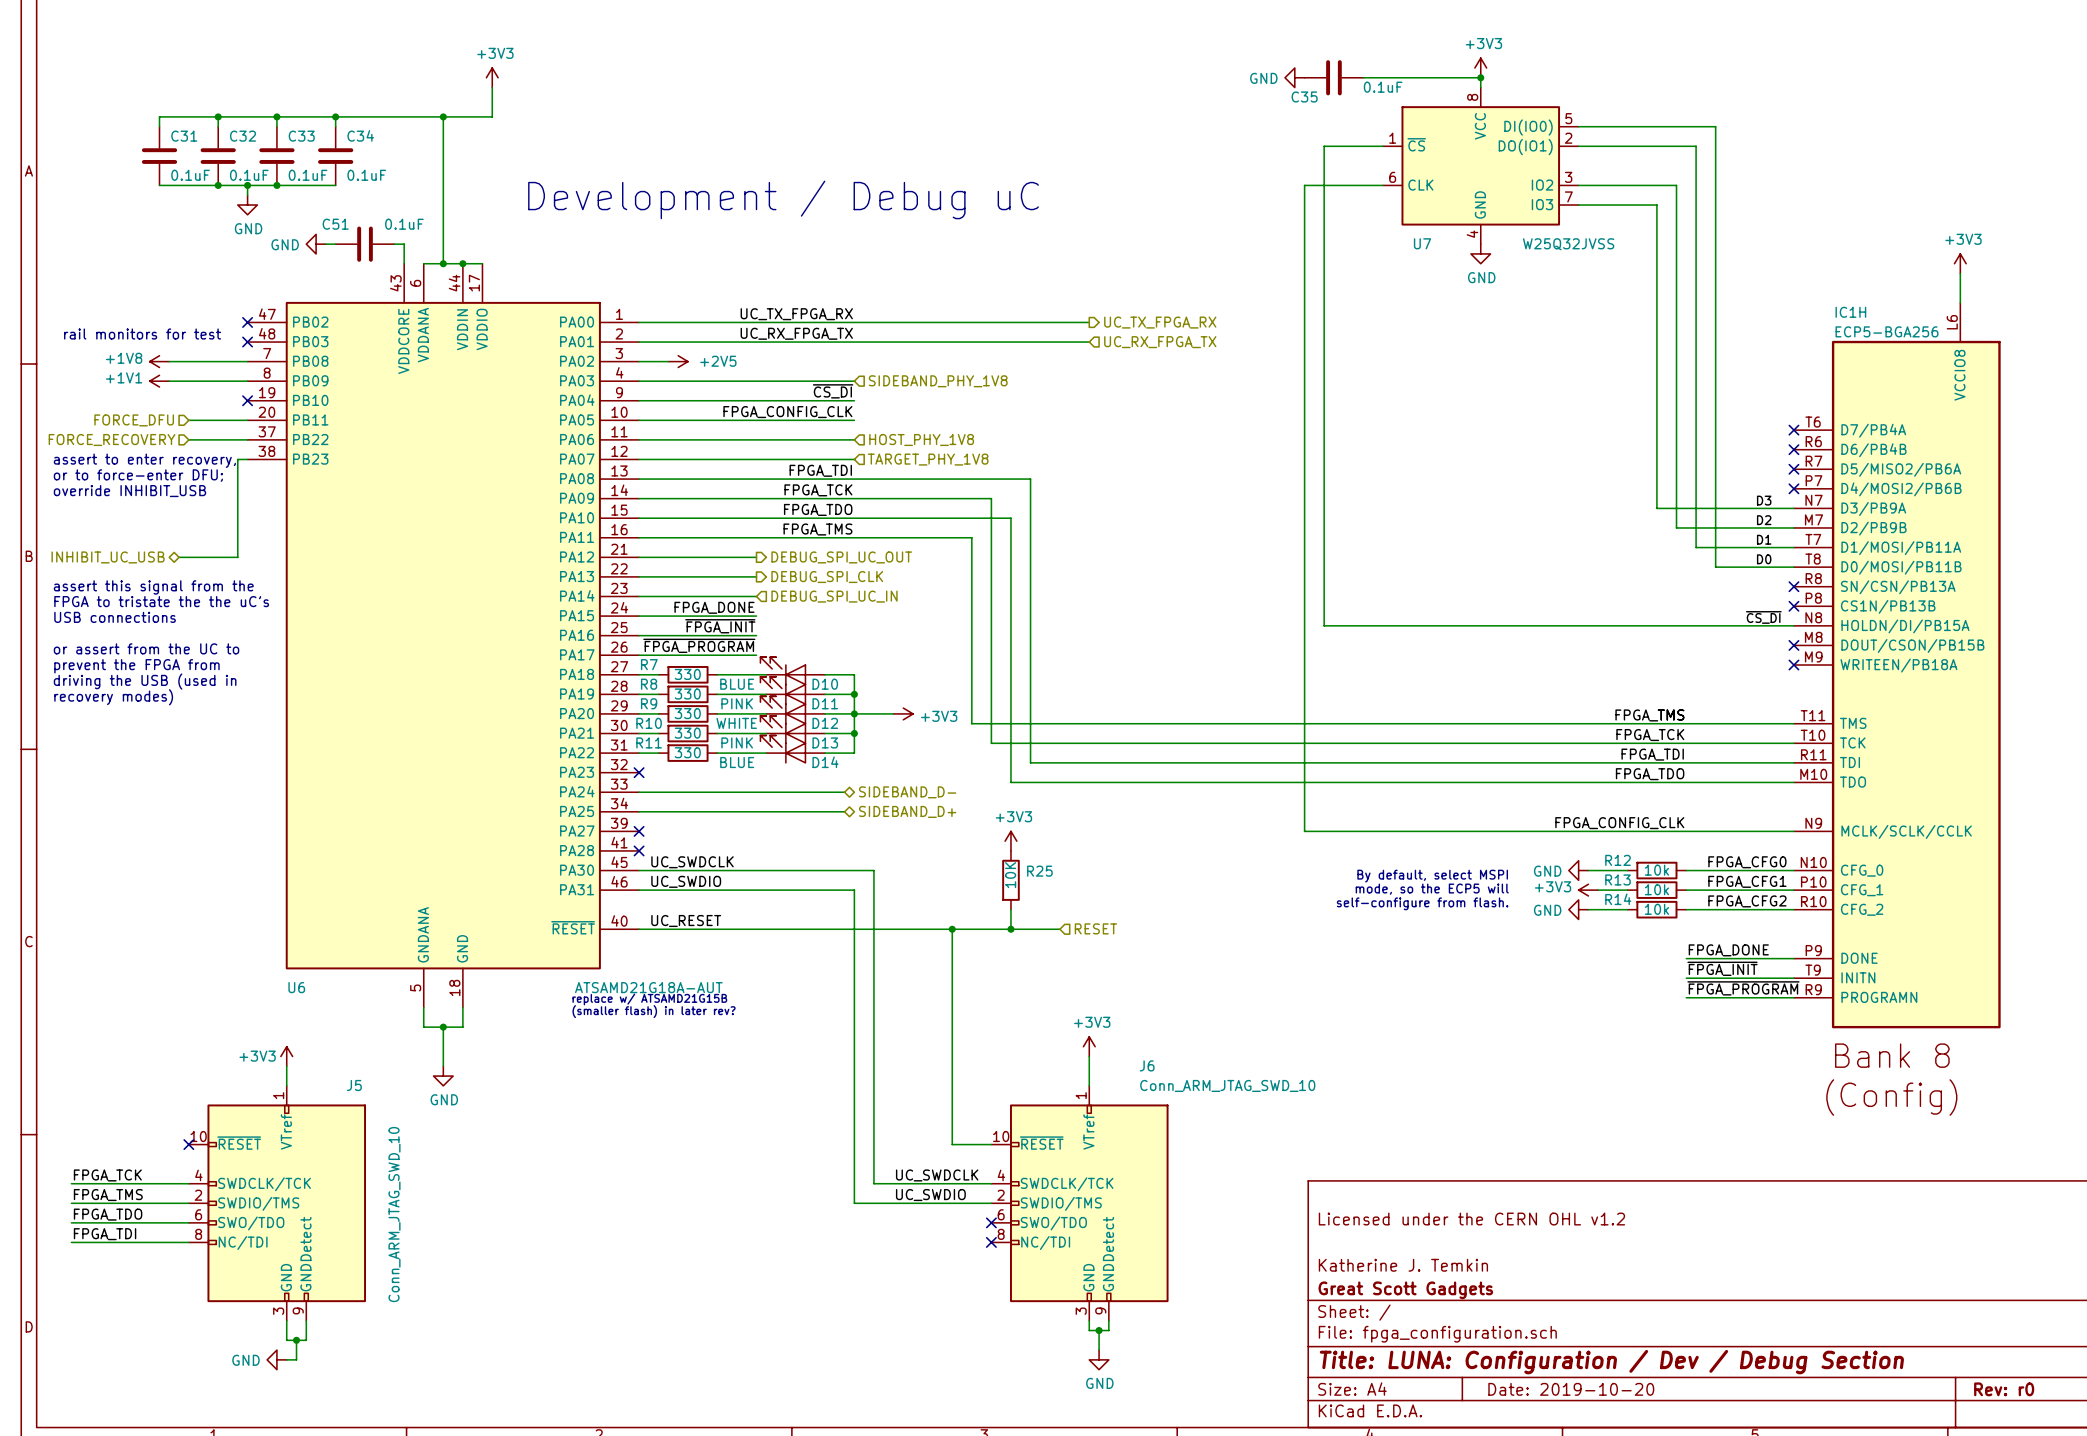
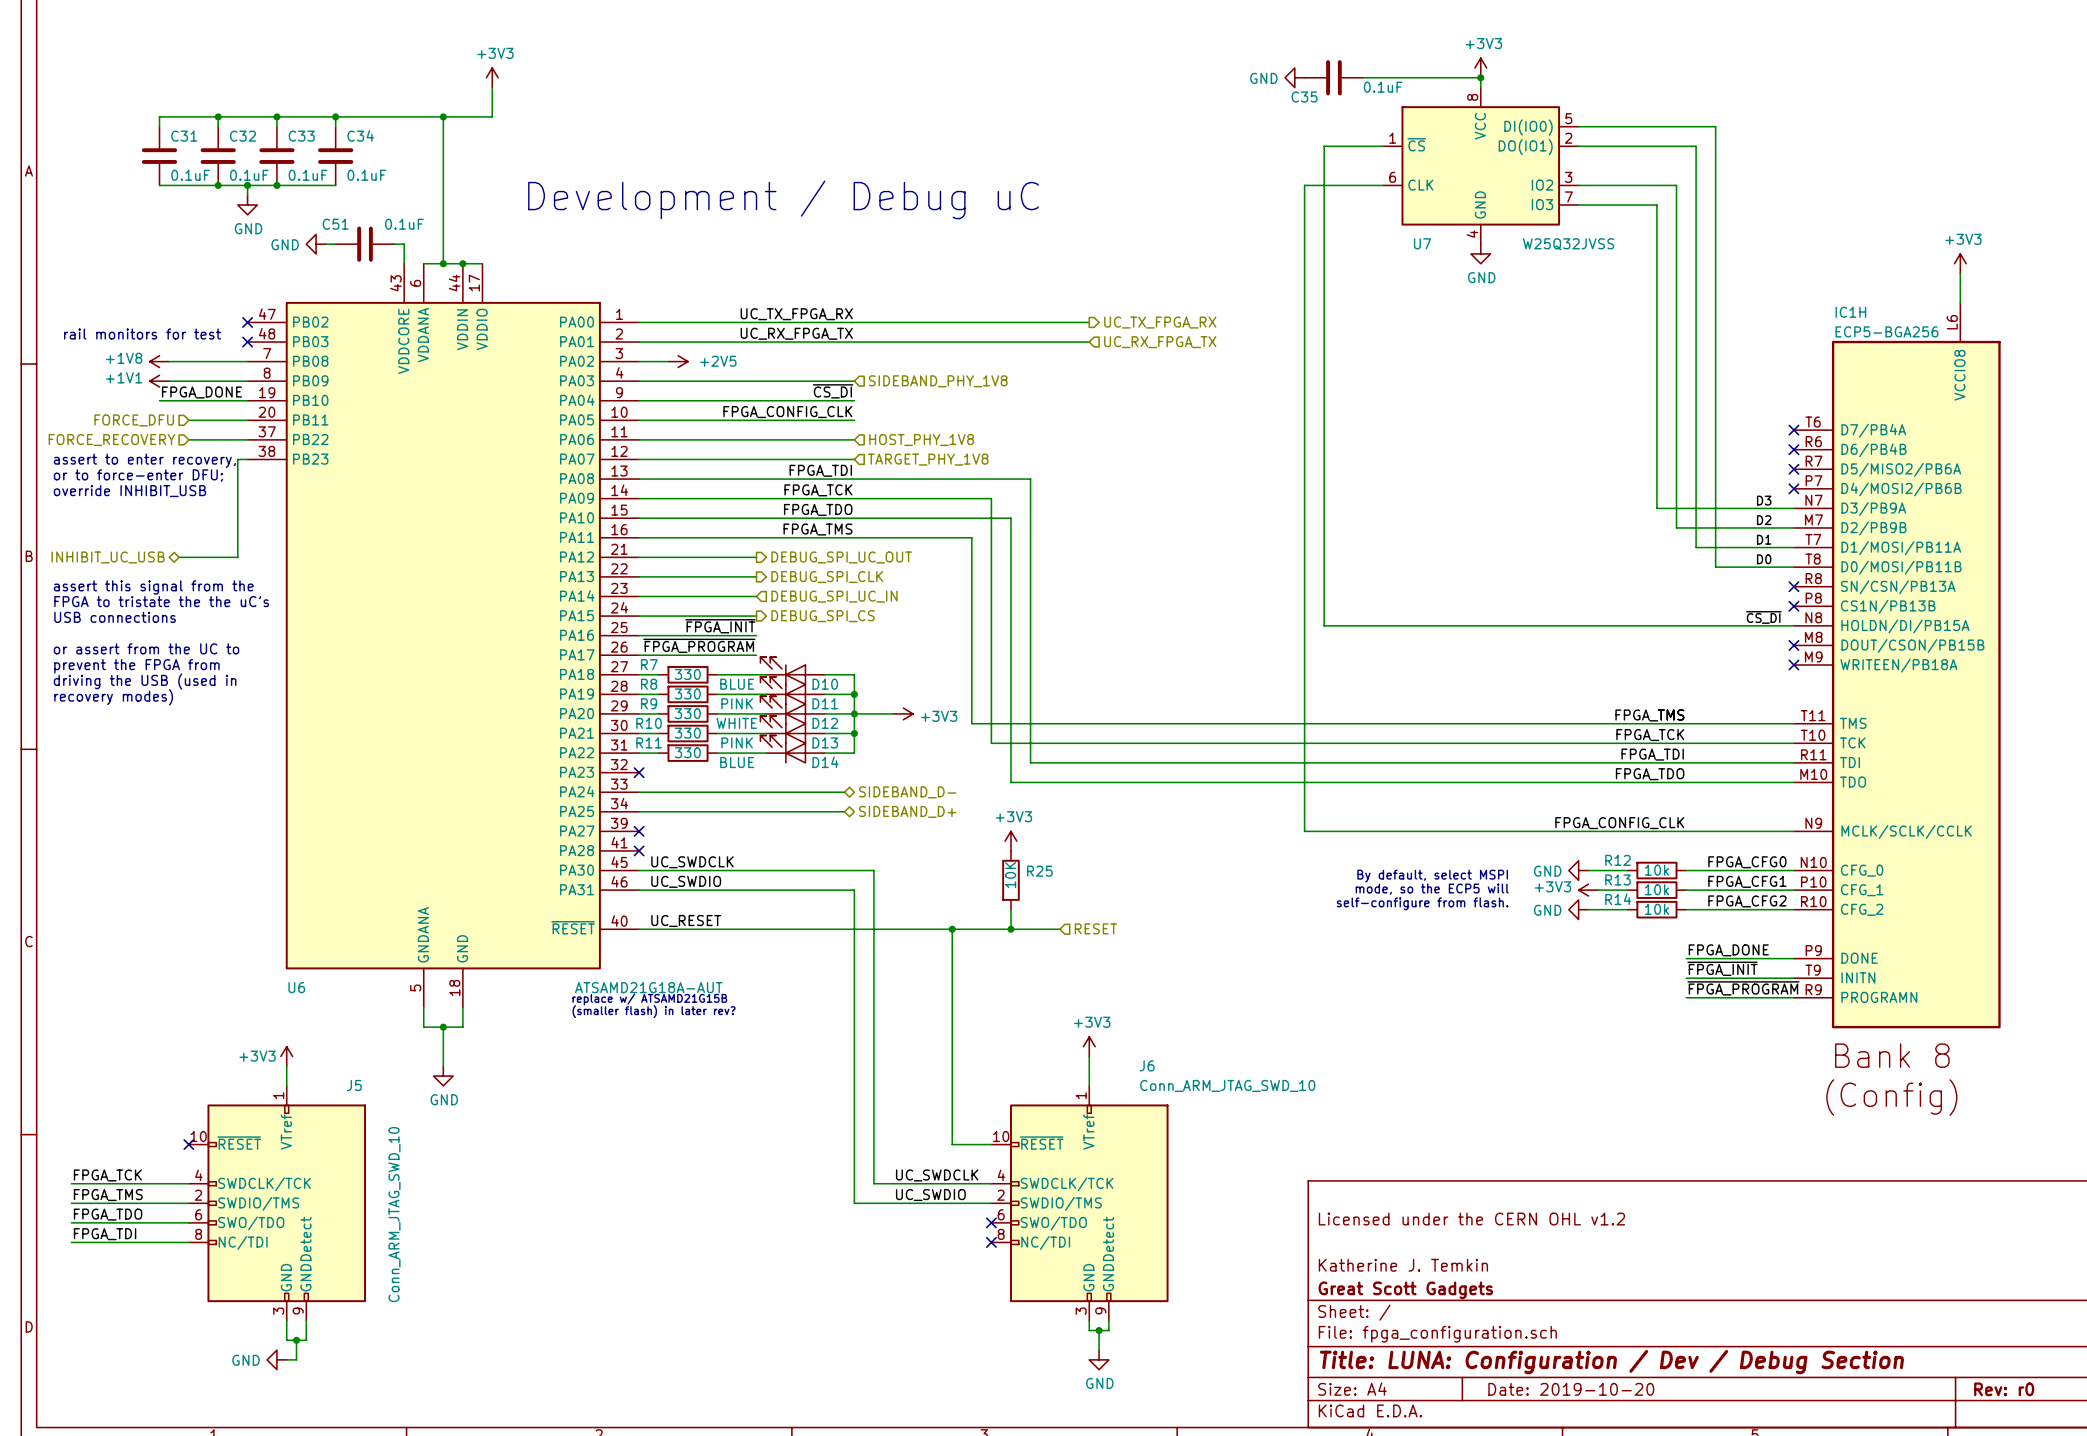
label: none -> FPGA_DONE (201, 392)
wire: none -> (159, 400) (247, 400)
no-connect mark: (247, 400) -> none
label: FPGA_DONE (714, 607) -> none
hierarchical label: none -> DEBUG_SPI_CS (823, 616)

